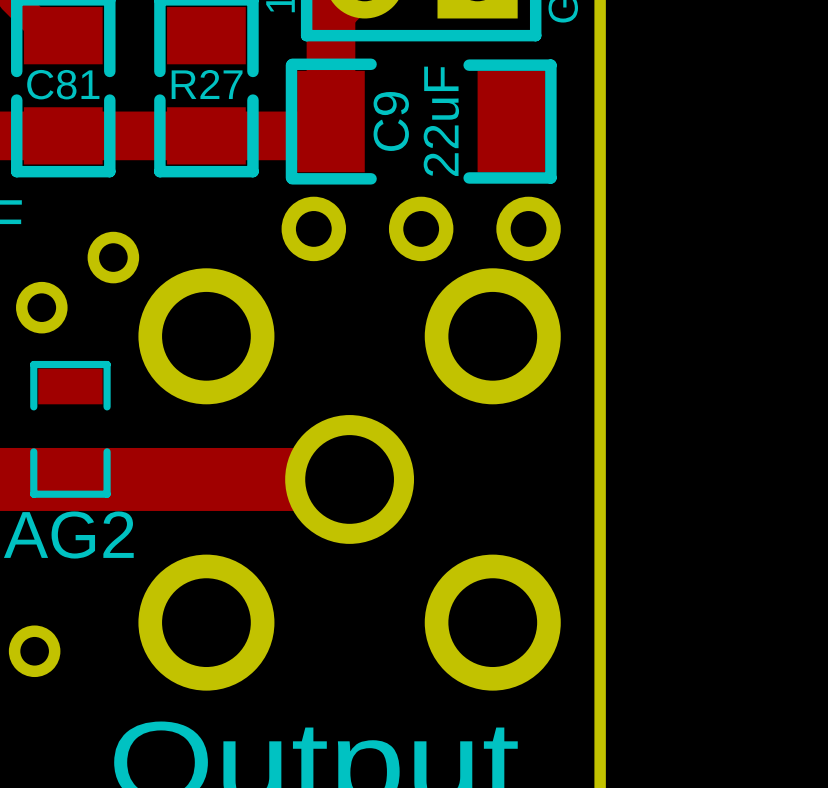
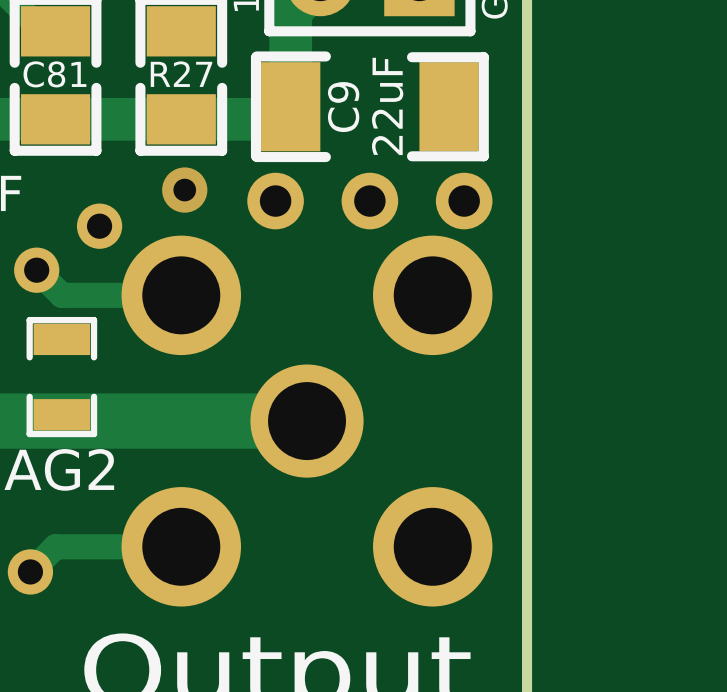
via: none -> (184, 190)
track: none -> (36, 270) (61, 295) (181, 295)
track: none -> (181, 546) (55, 546) (30, 571)

